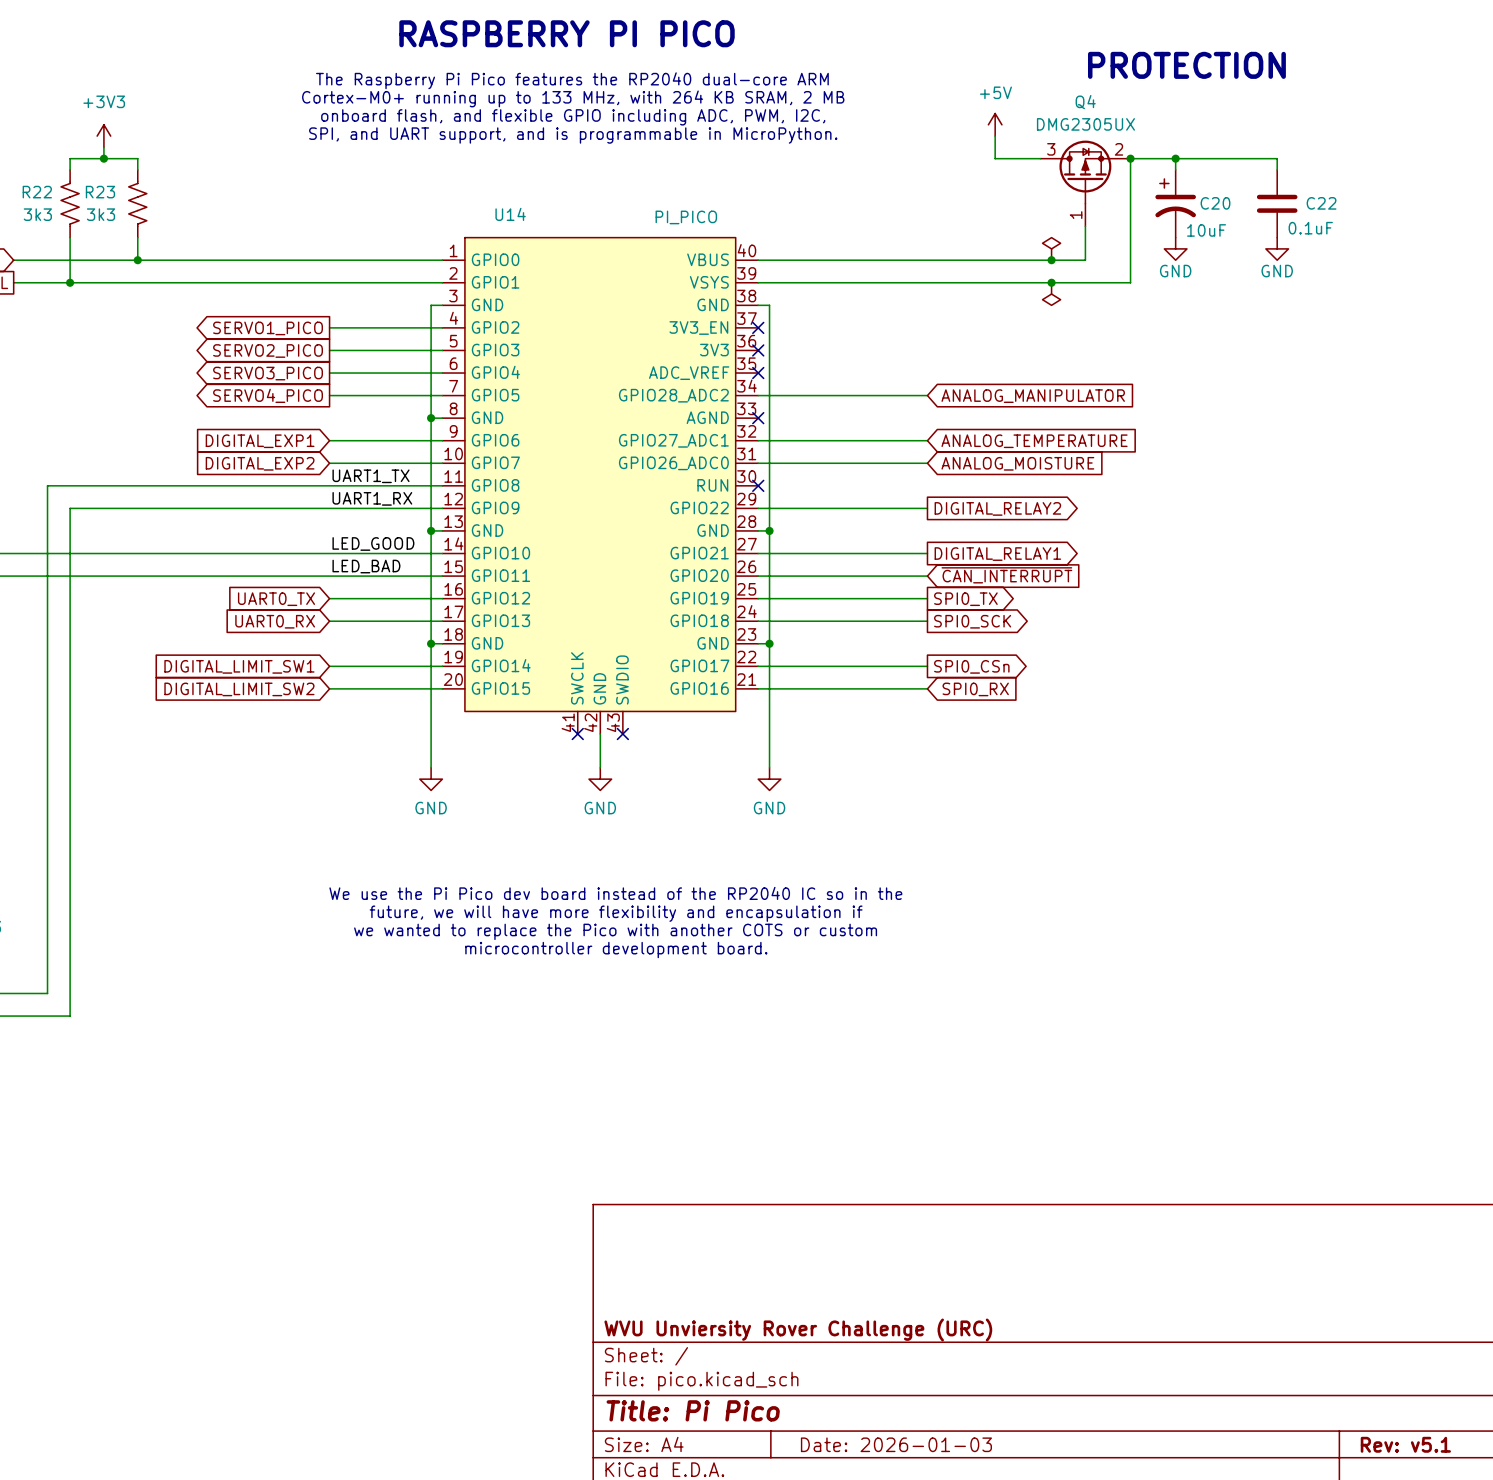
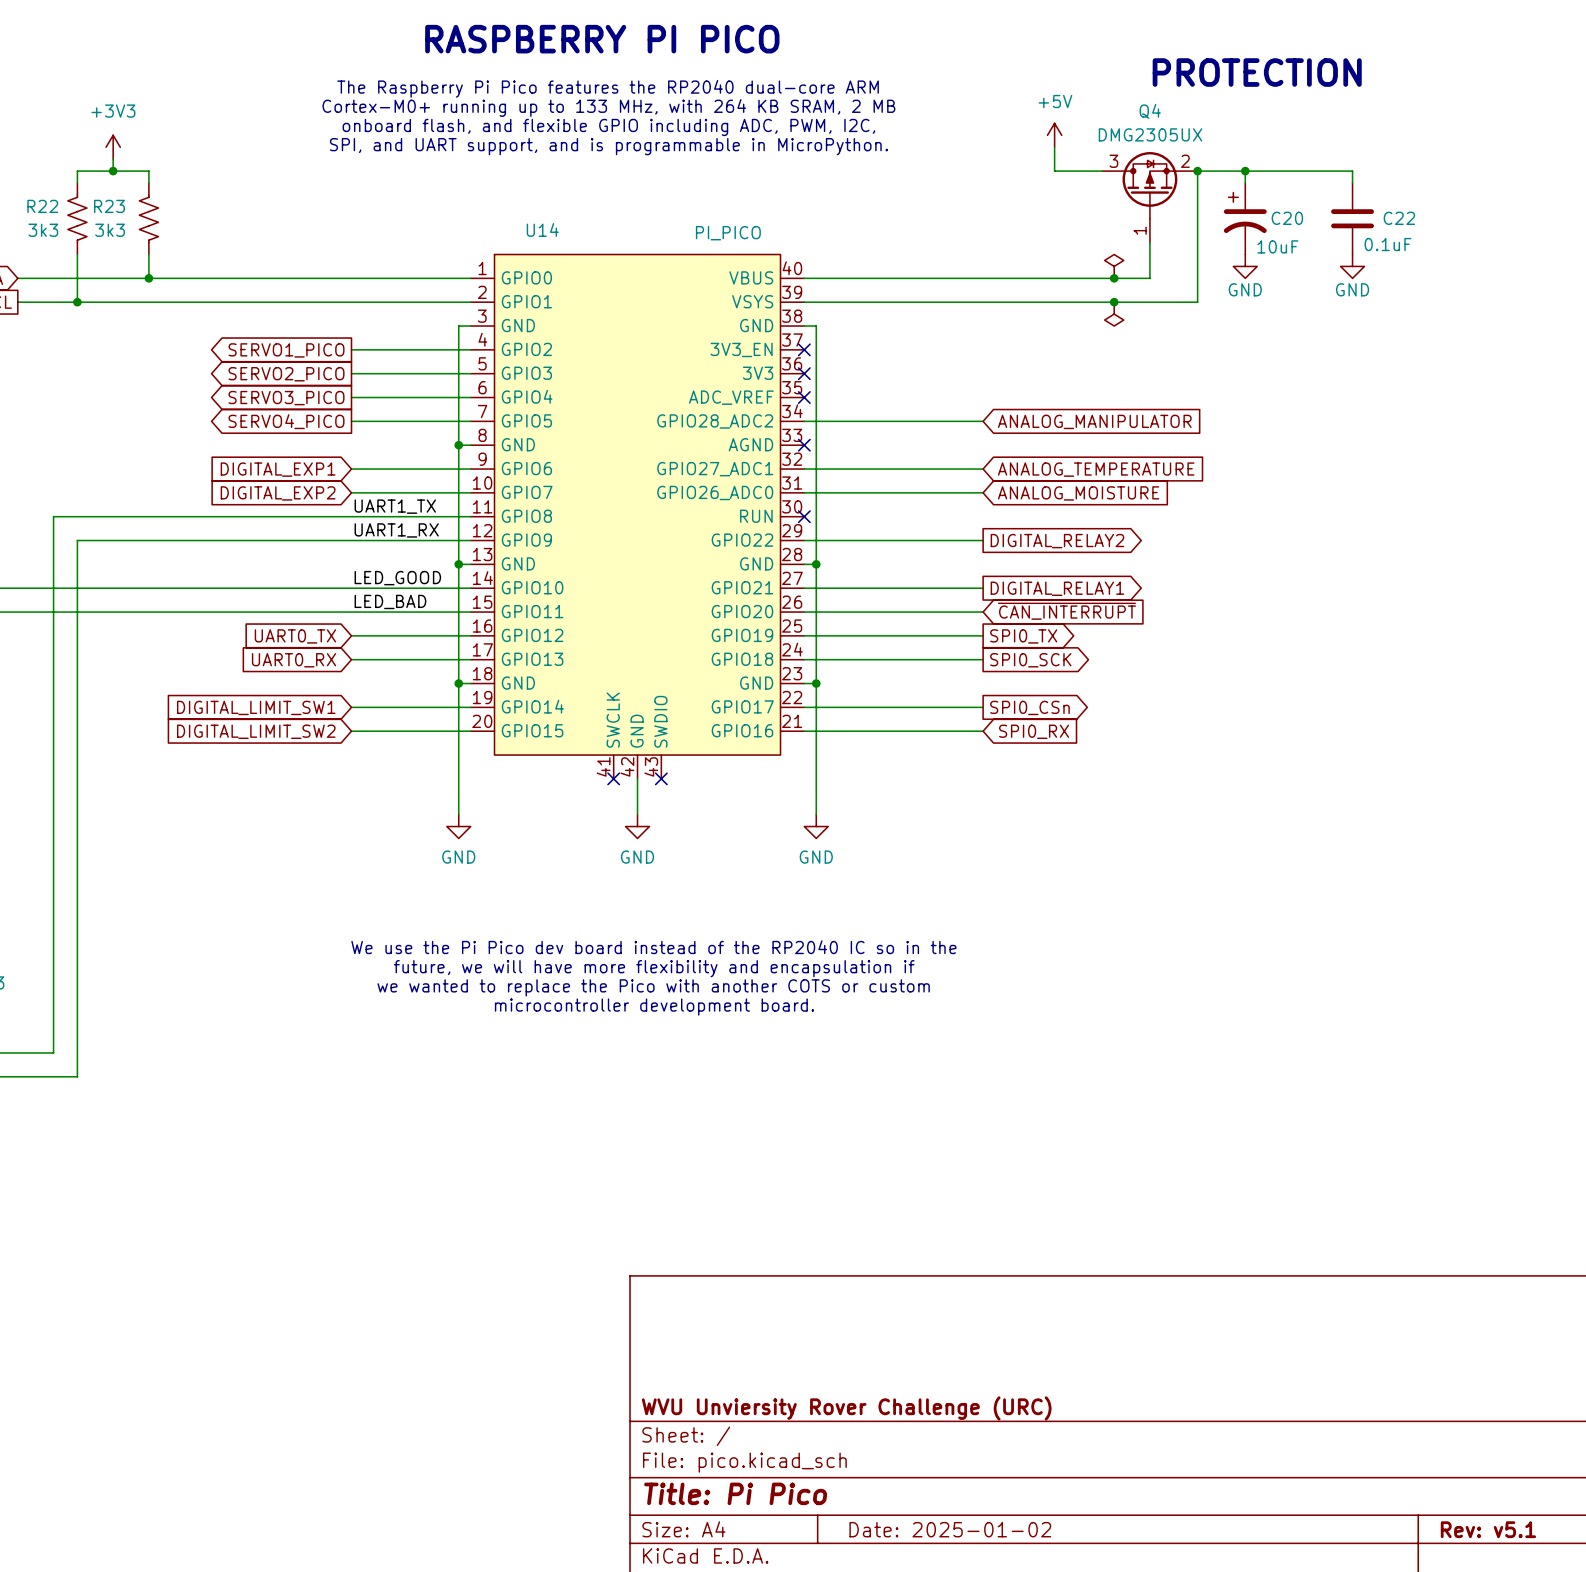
title block: Date: 2026-01-03 (896, 1444) -> Date: 2025-01-02 (950, 1529)

